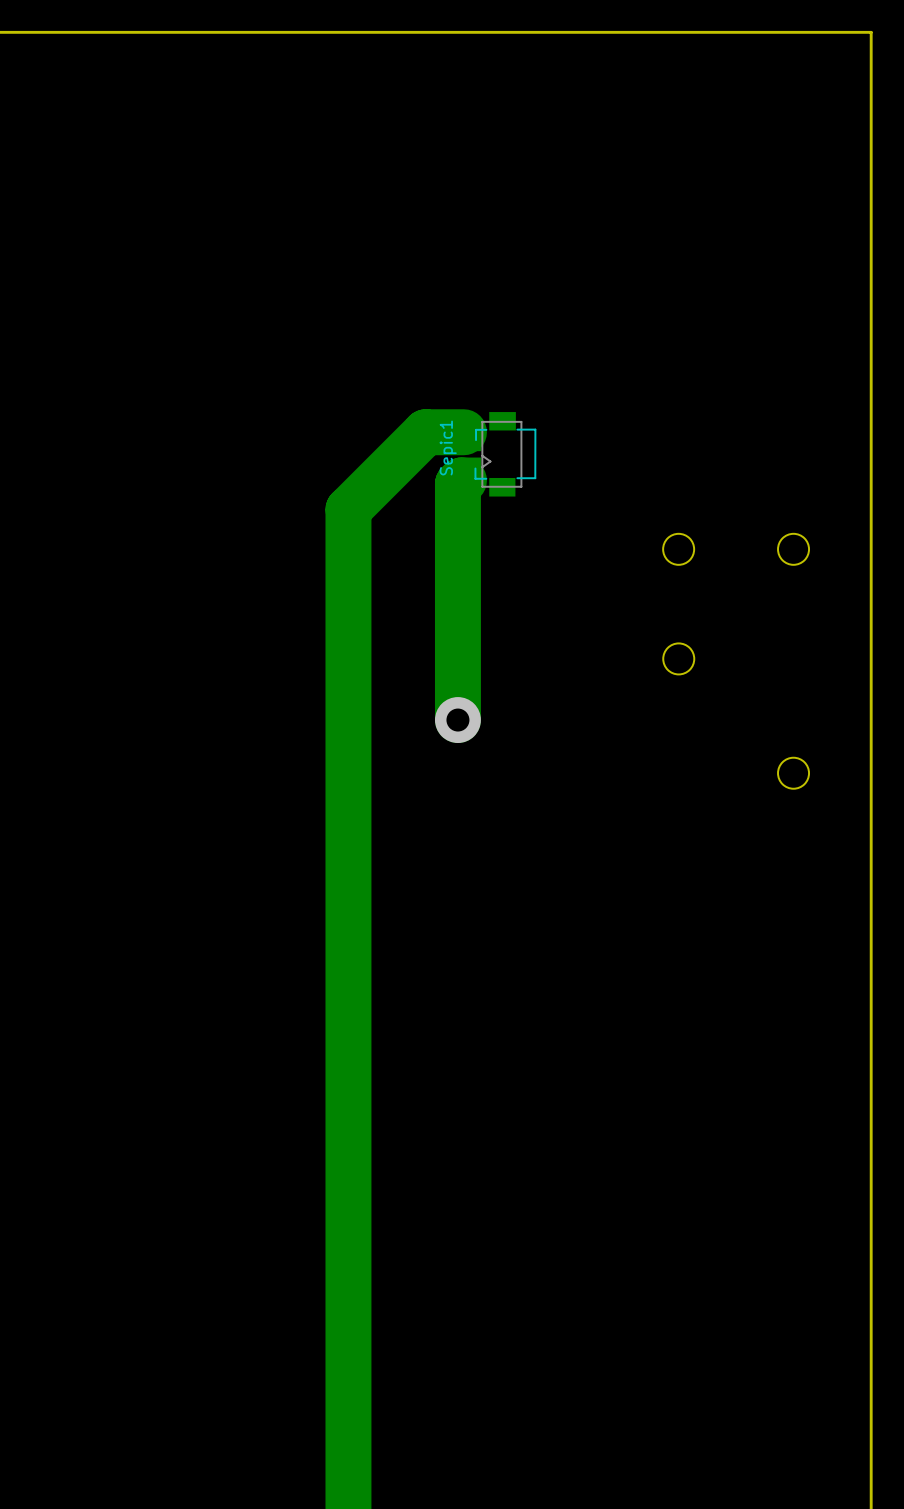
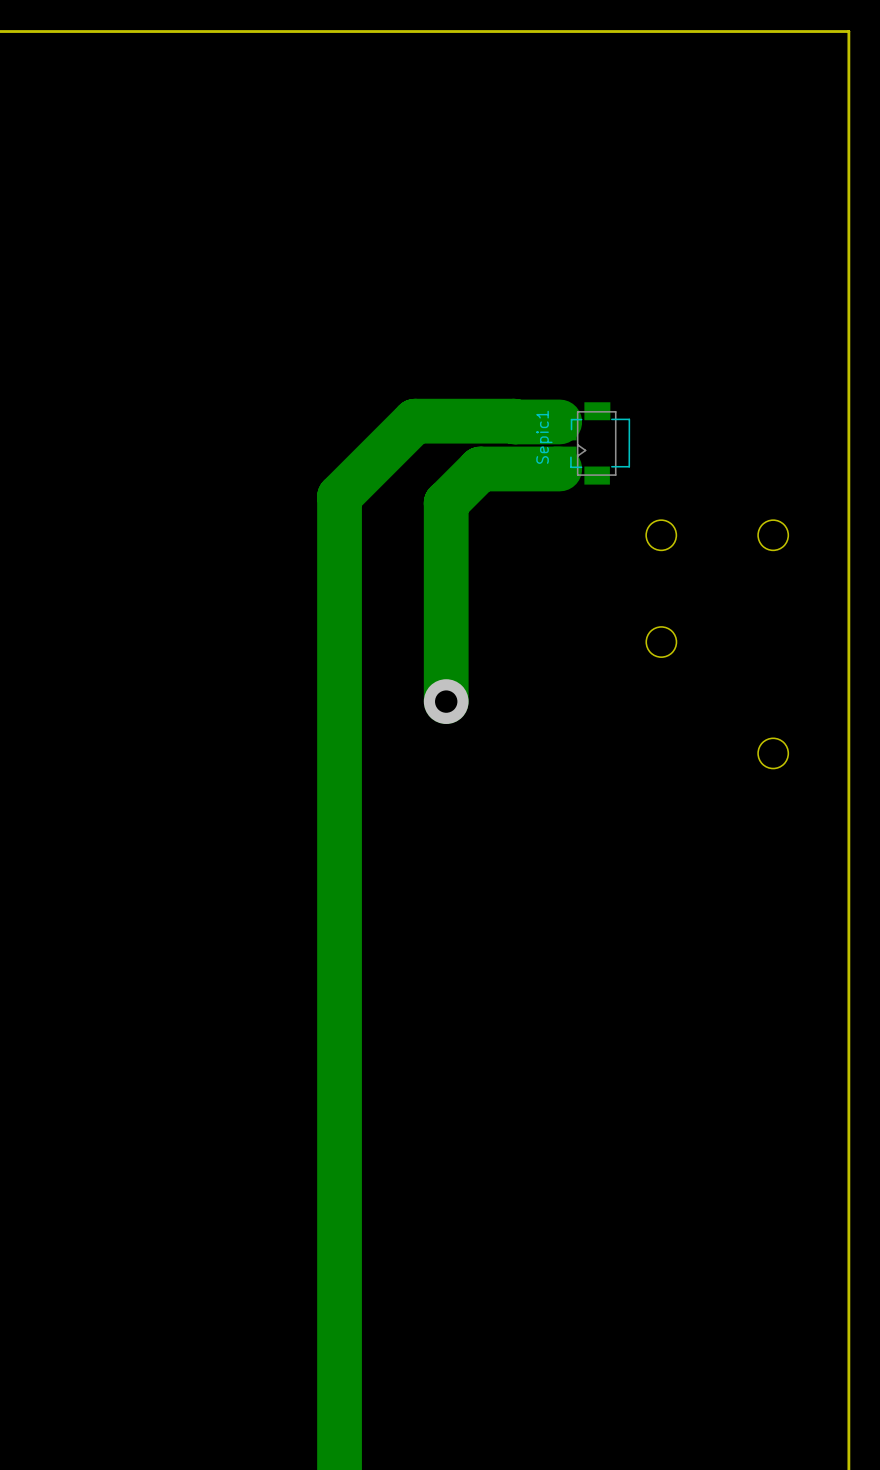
track: none -> (452, 421) (559, 421)
Sepic1 position: (496, 454) -> (591, 443)
track: (463, 480) (457, 483) (457, 516) -> (559, 468) (480, 468) (446, 503)

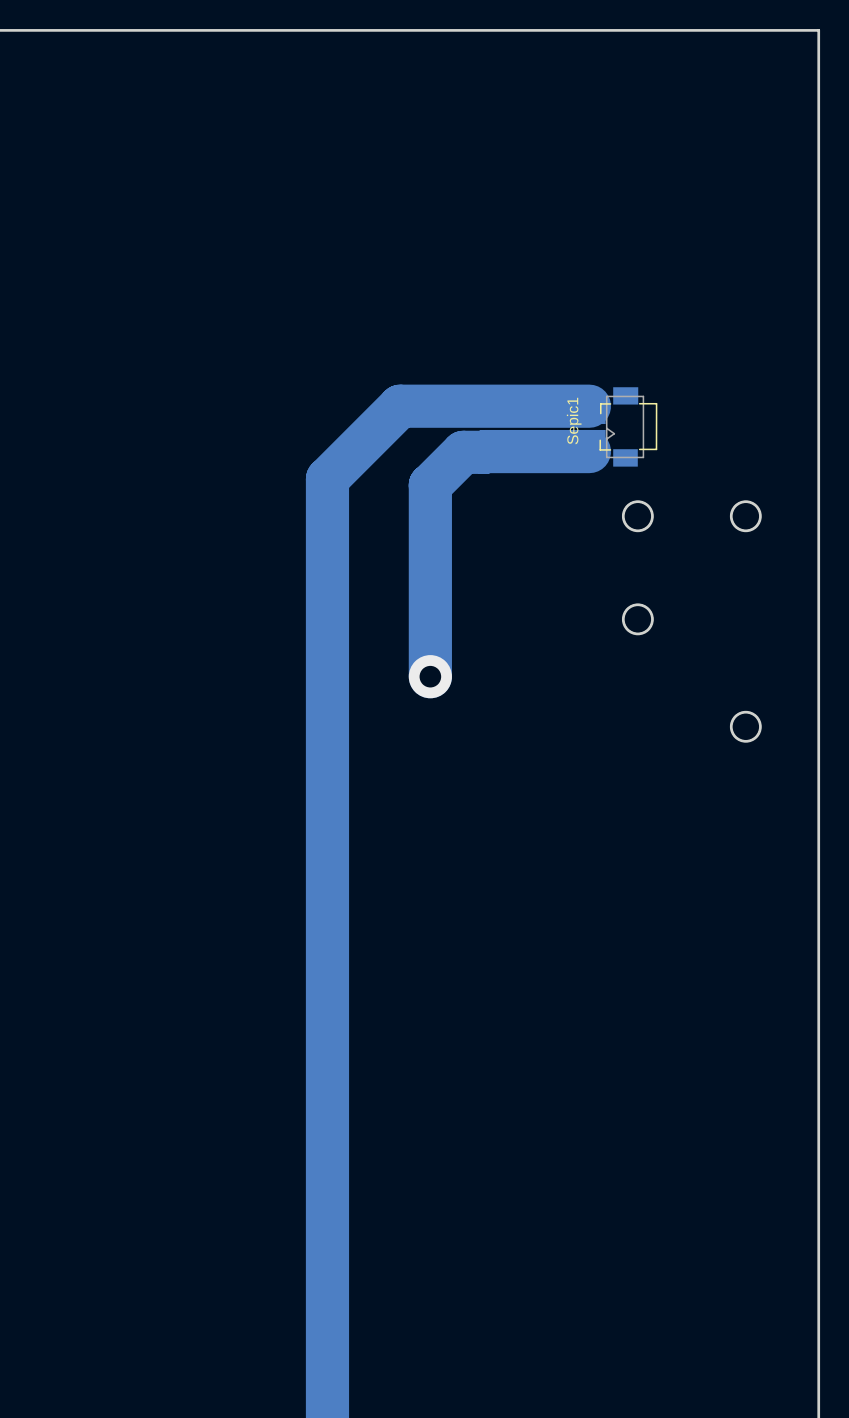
track: (514, 421) (559, 421) -> (495, 406) (589, 406)
Sepic1 position: (591, 443) -> (620, 426)
track: (559, 468) (502, 468) -> (589, 451) (484, 452)
round board edge: none -> [621, 500, 654, 533]
round board edge: none -> [729, 500, 762, 533]
round board edge: none -> [621, 603, 654, 636]
round board edge: none -> [729, 710, 762, 743]

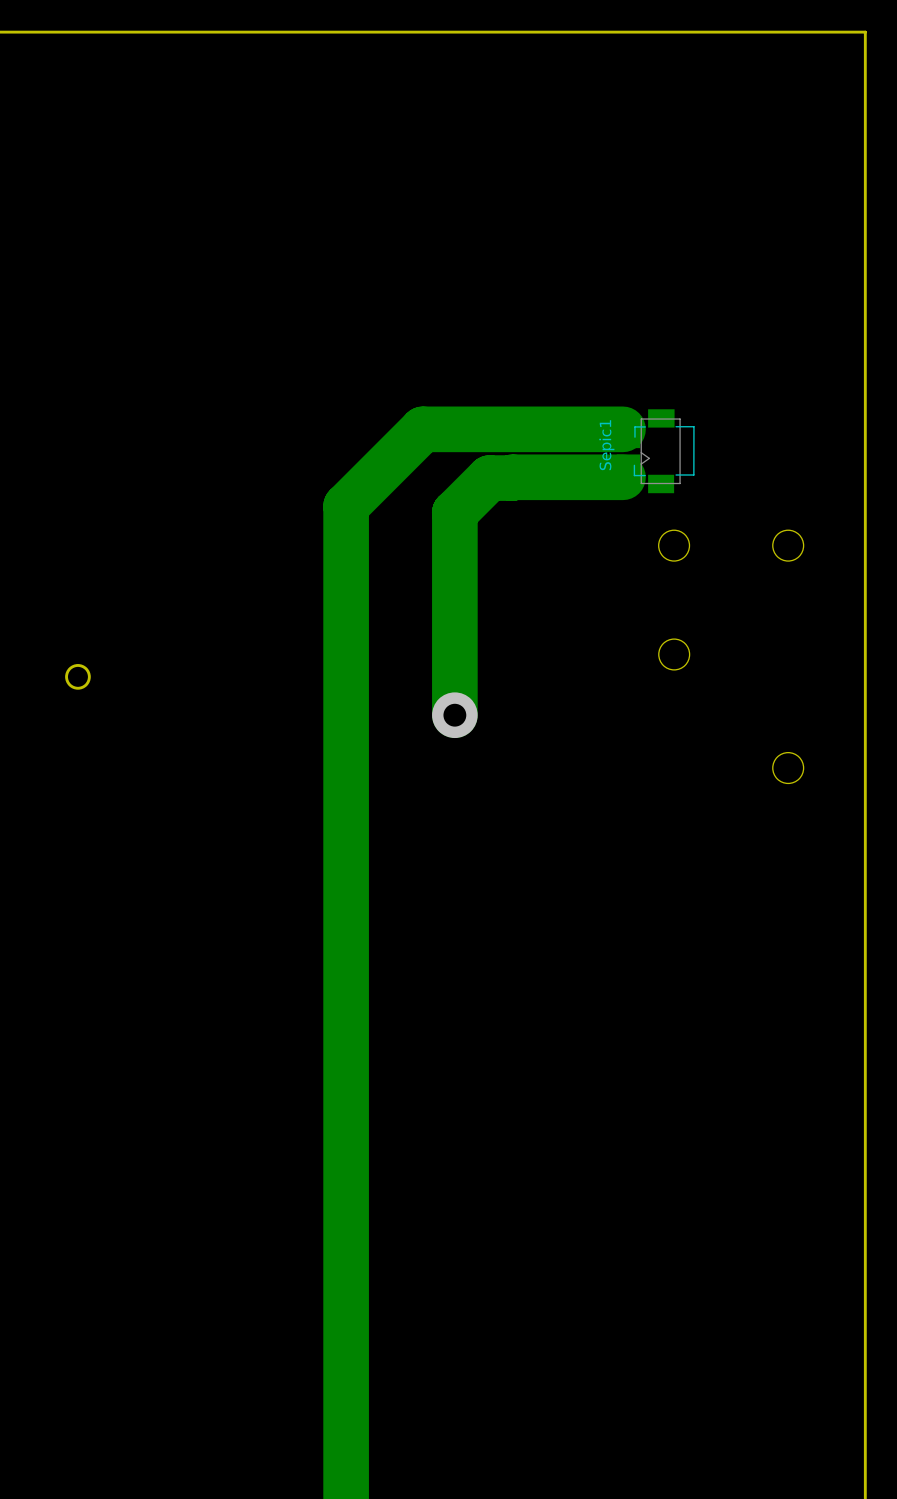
round board edge: [621, 500, 654, 533] -> none
round board edge: [729, 500, 762, 533] -> none
round board edge: [621, 603, 654, 636] -> none
round board edge: none -> [65, 664, 91, 690]
round board edge: [729, 710, 762, 743] -> none

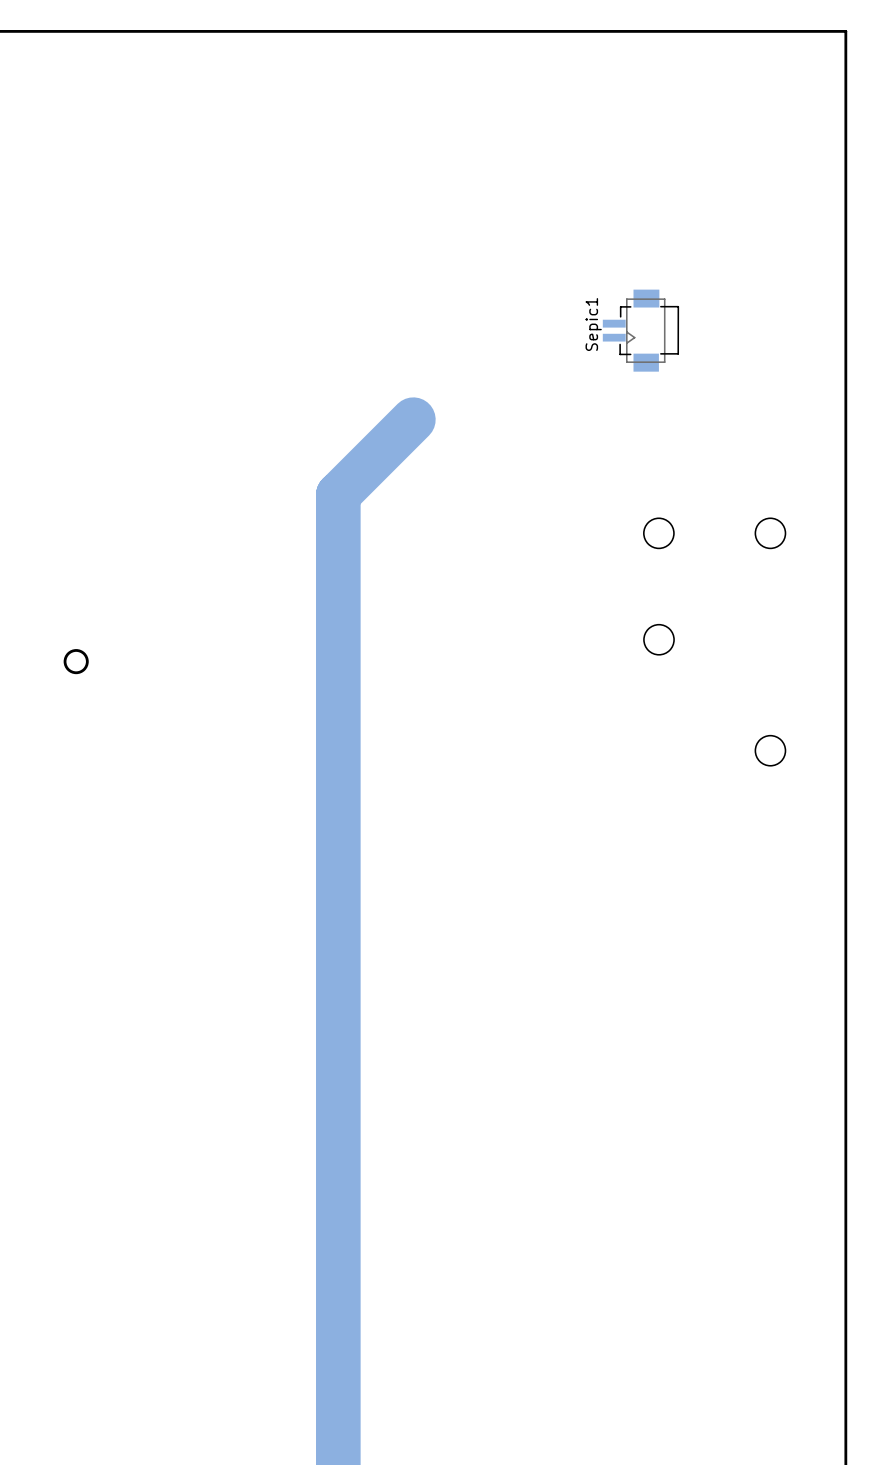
track: (622, 429) (422, 429) -> none
Sepic1 position: (655, 451) -> (640, 330)
track: (622, 477) (489, 478) (454, 512) (454, 715) -> none
via: (454, 715) -> none

